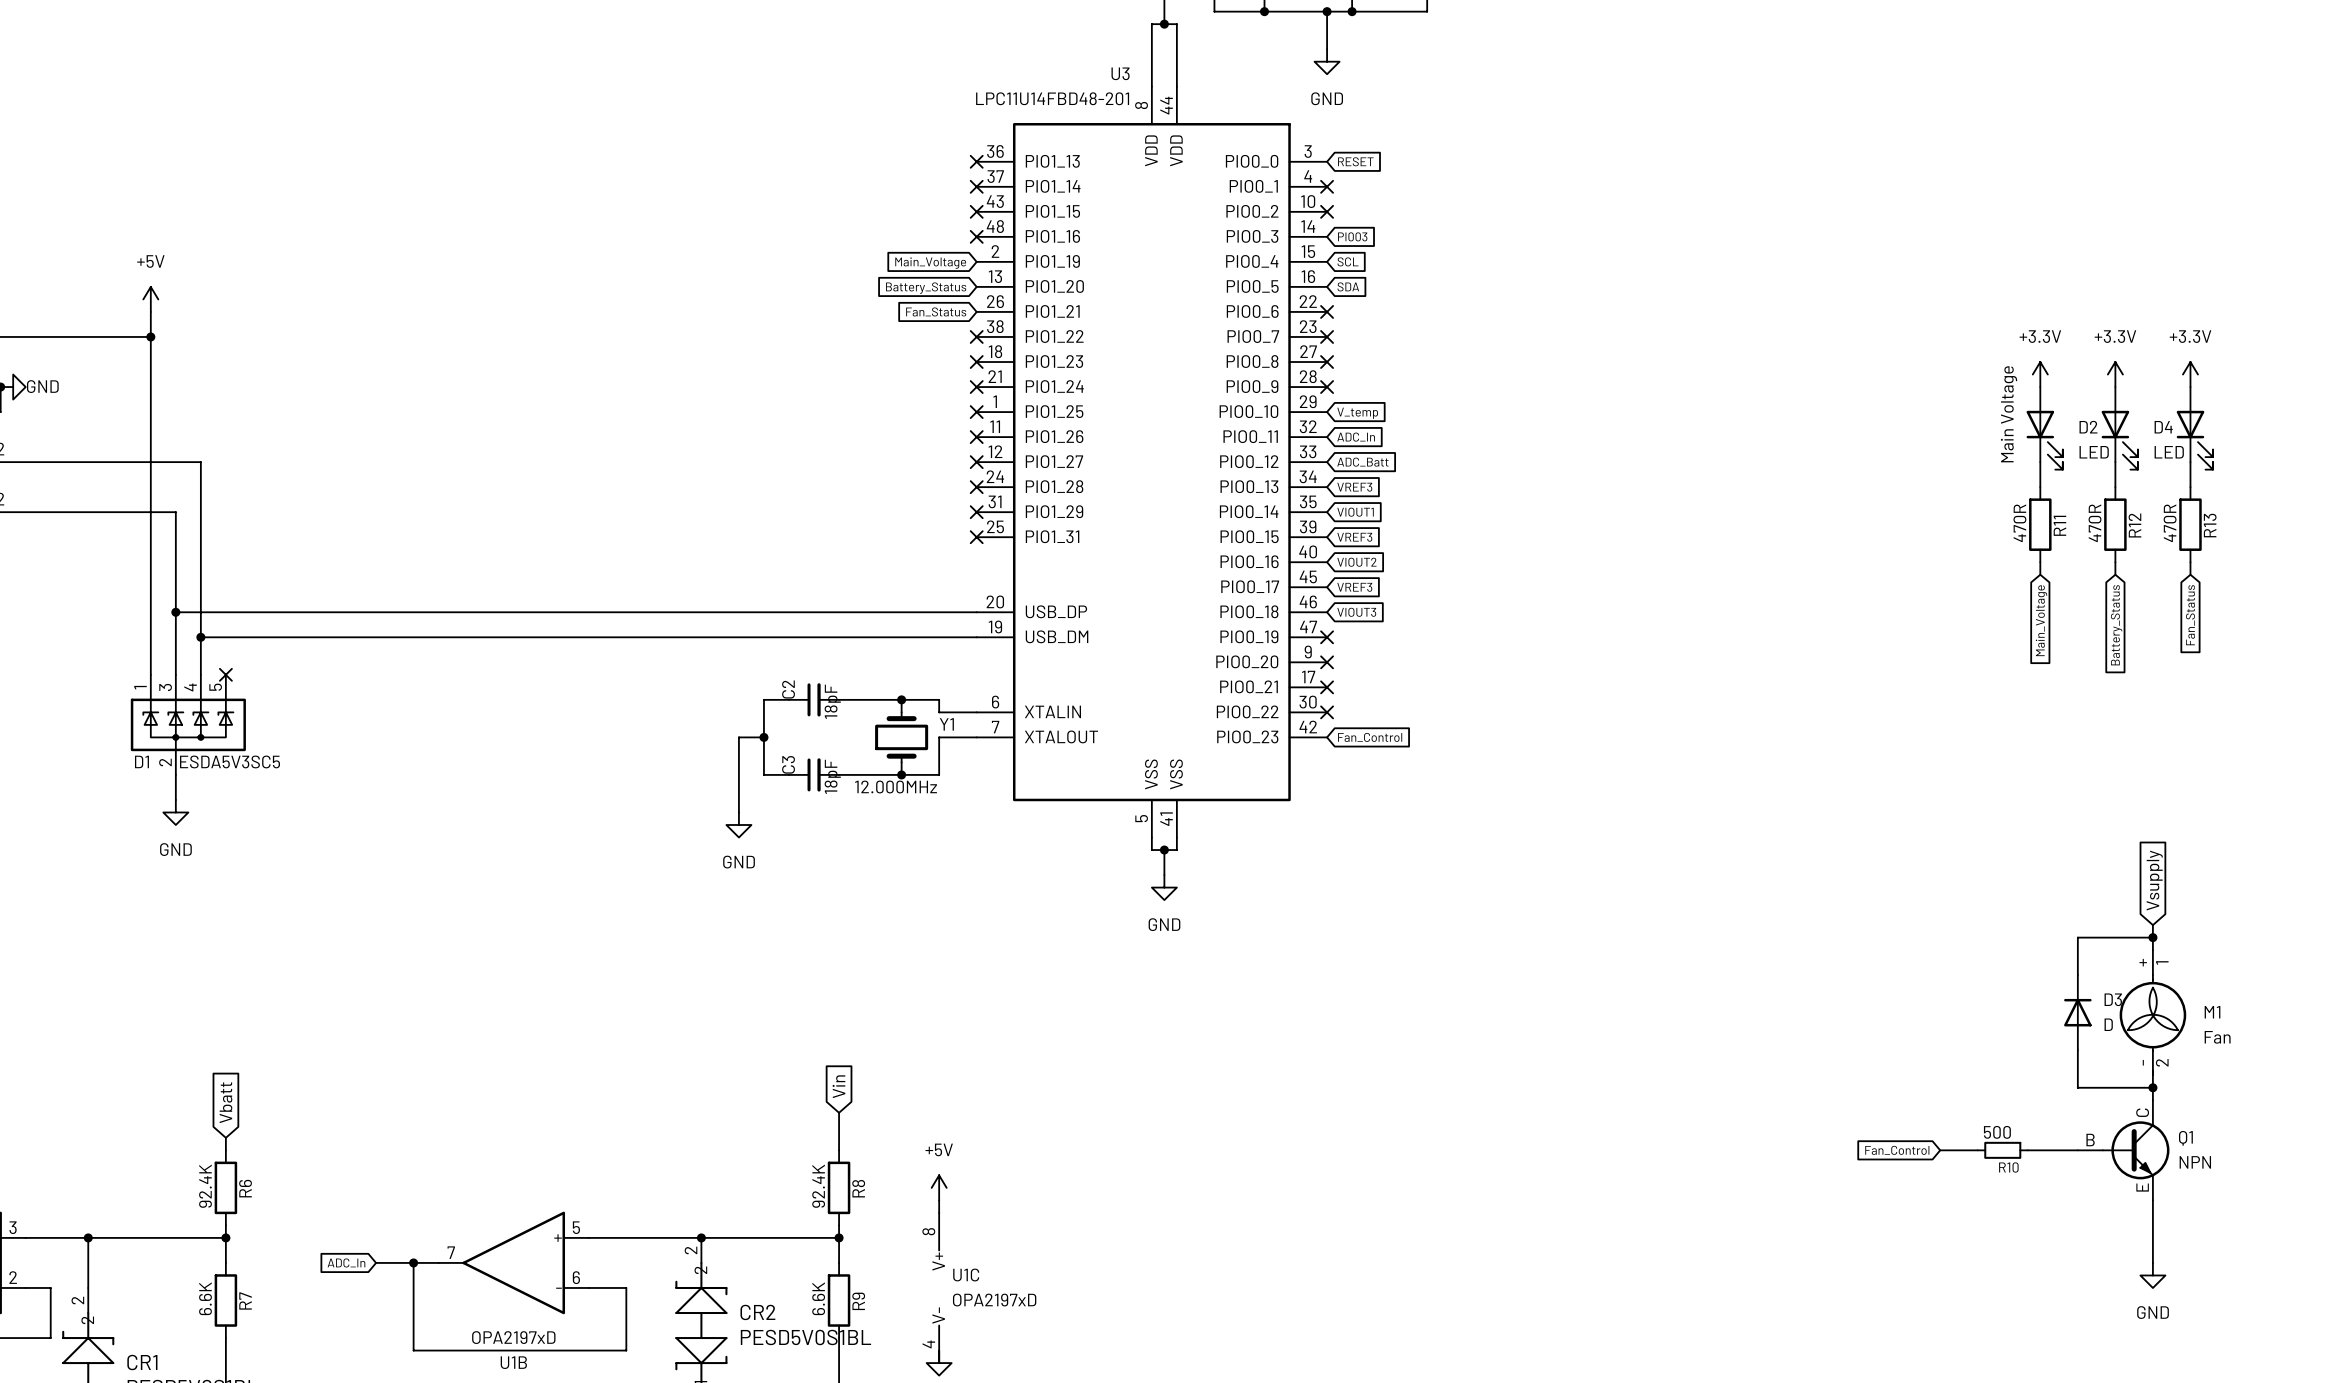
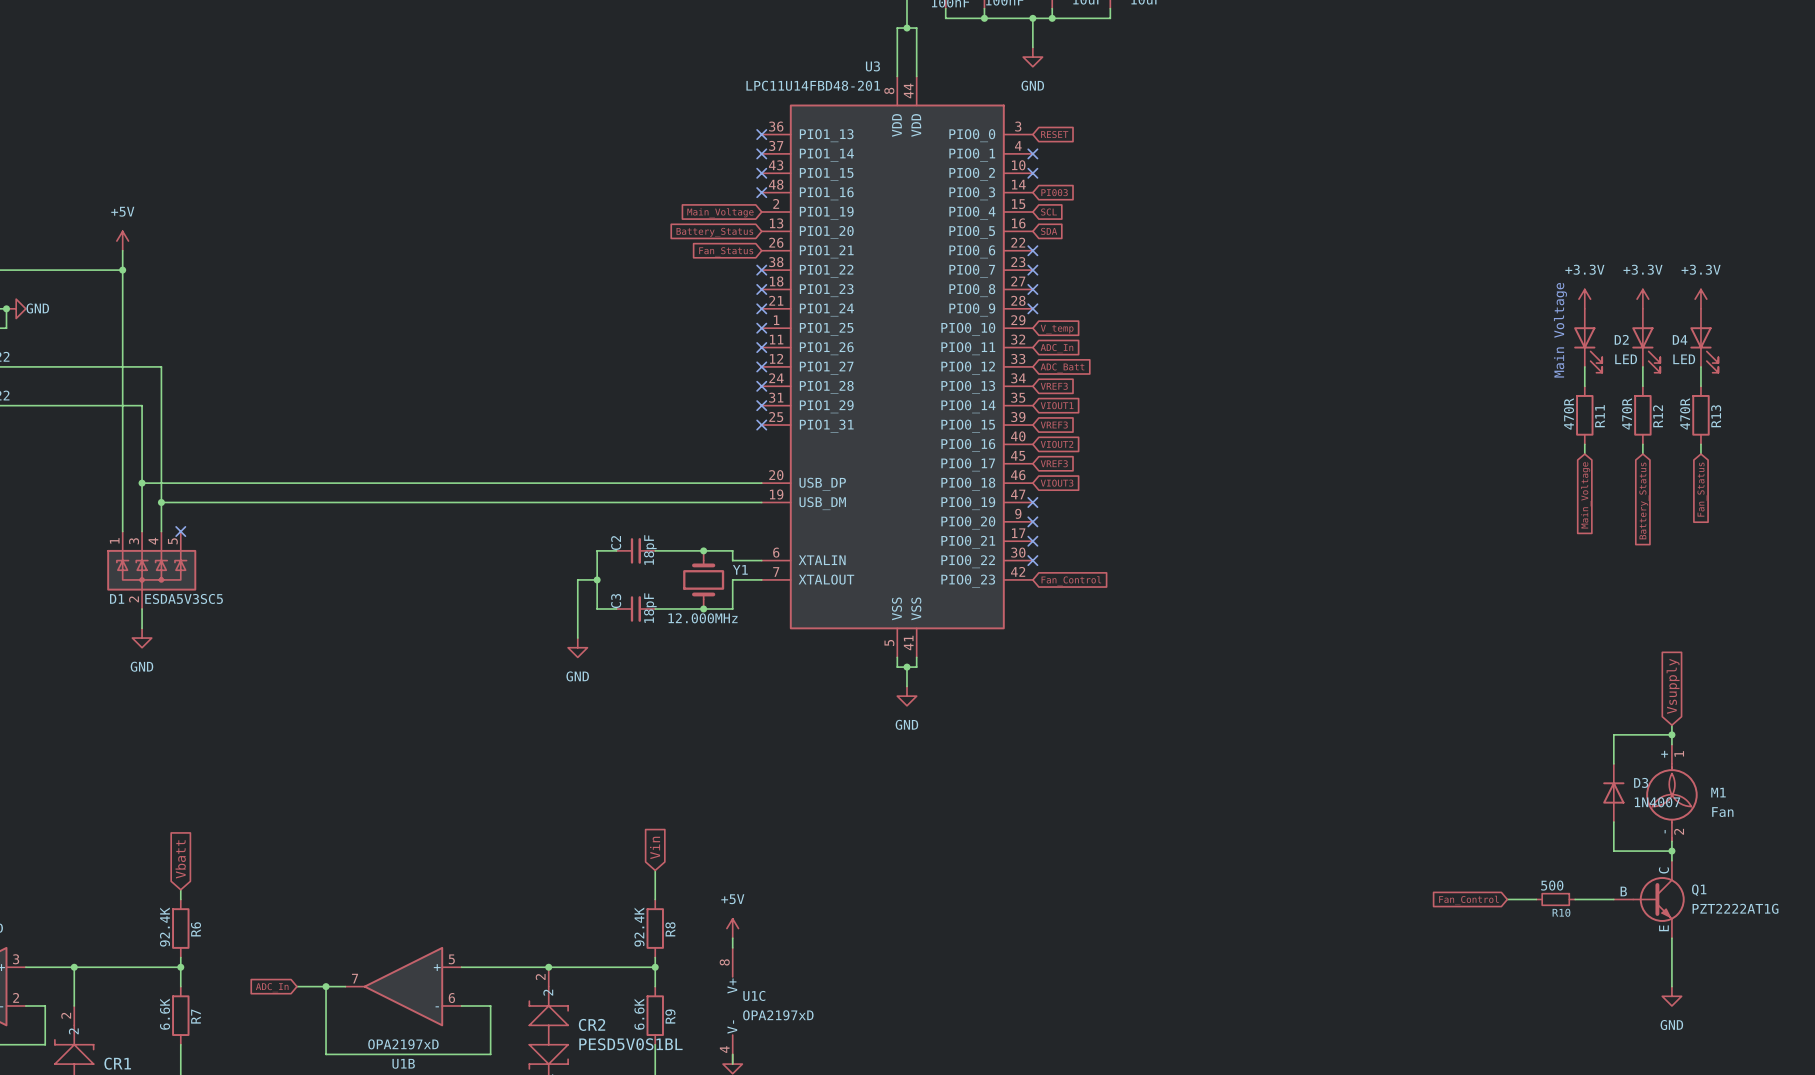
D3 value: D (2108, 1024) -> 1N4007 (1657, 802)
Q1 value: NPN (2195, 1162) -> PZT2222AT1G (1735, 908)

